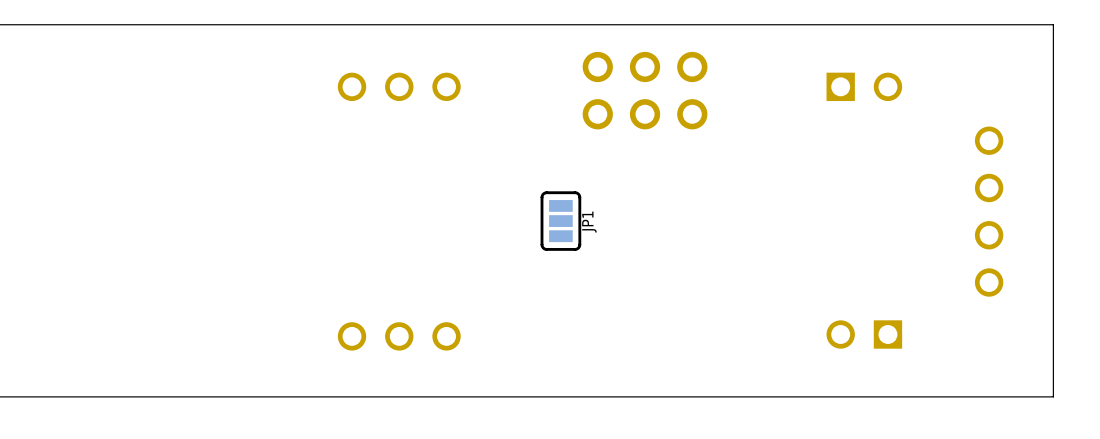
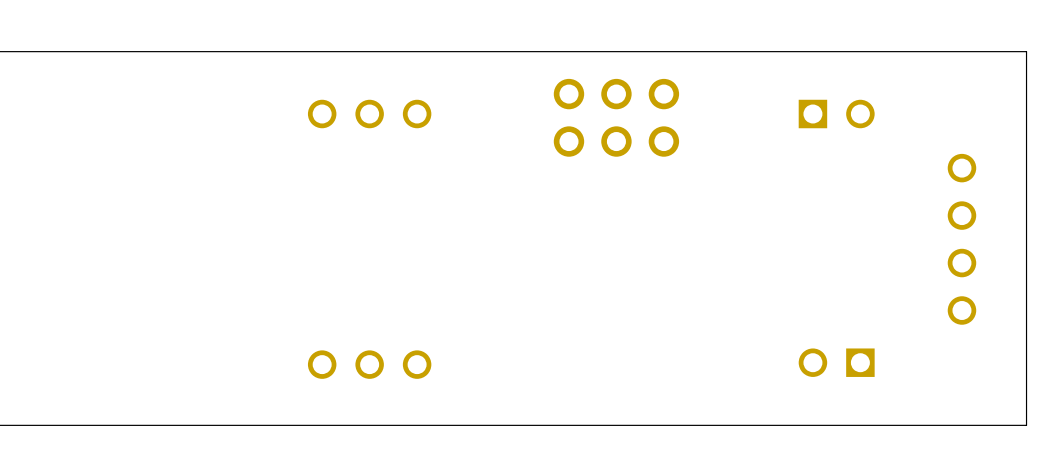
JP1: (560, 221) -> none

